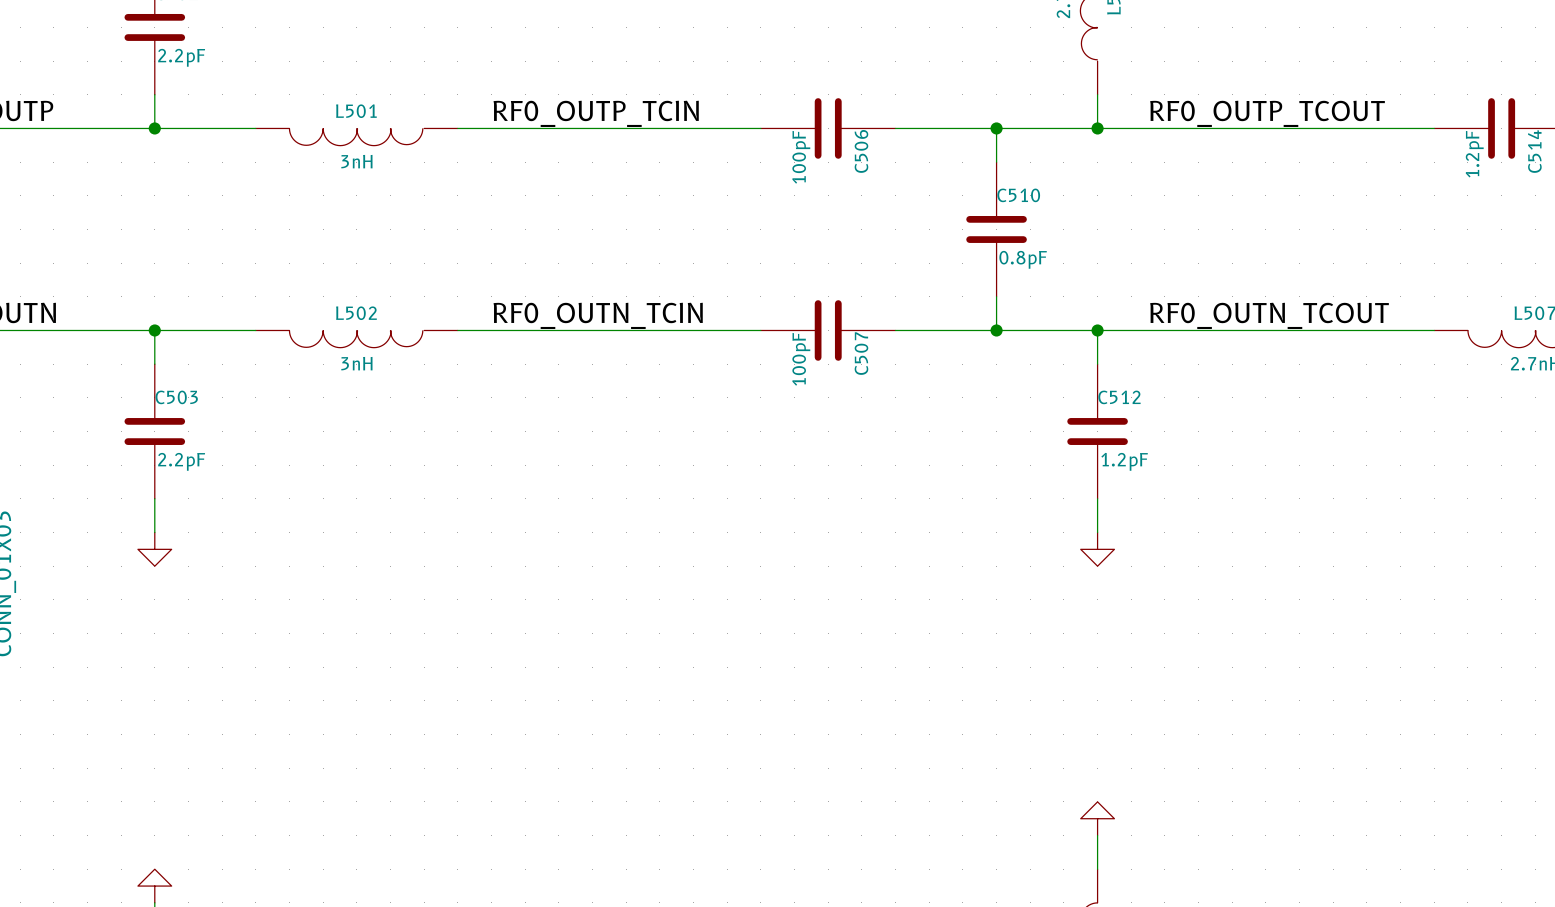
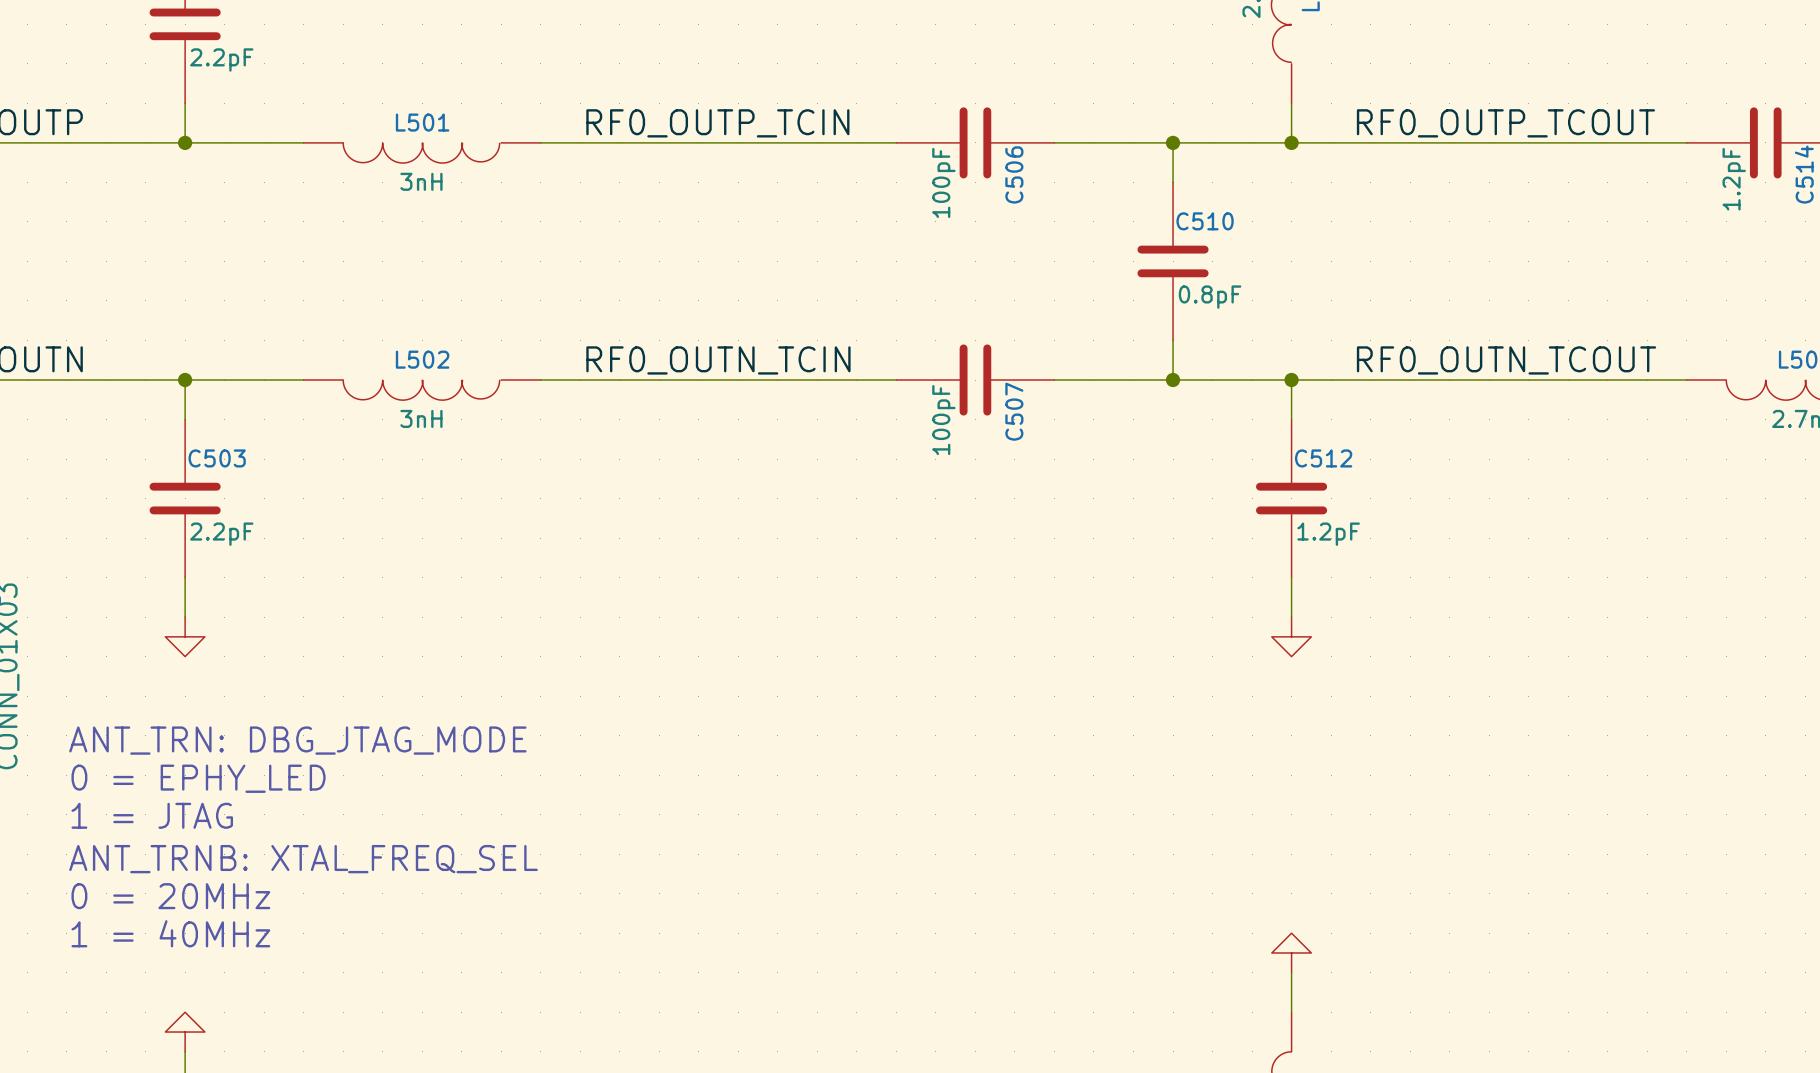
text: none -> ANT_TRN: DBG_JTAG_MODE (297, 740)
text: none -> 0 = EPHY_LED (198, 778)
text: none -> 1 = JTAG (152, 815)
text: none -> ANT_TRNB: XTAL_FREQ_SEL (303, 859)
text: none -> 0 = 20MHz (170, 896)
text: none -> 1 = 40MHz (170, 933)

